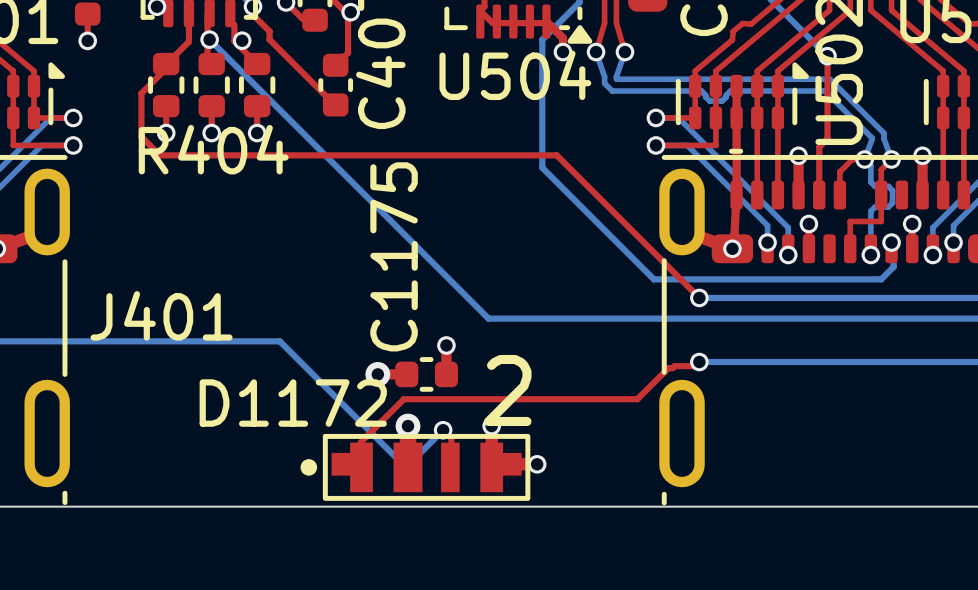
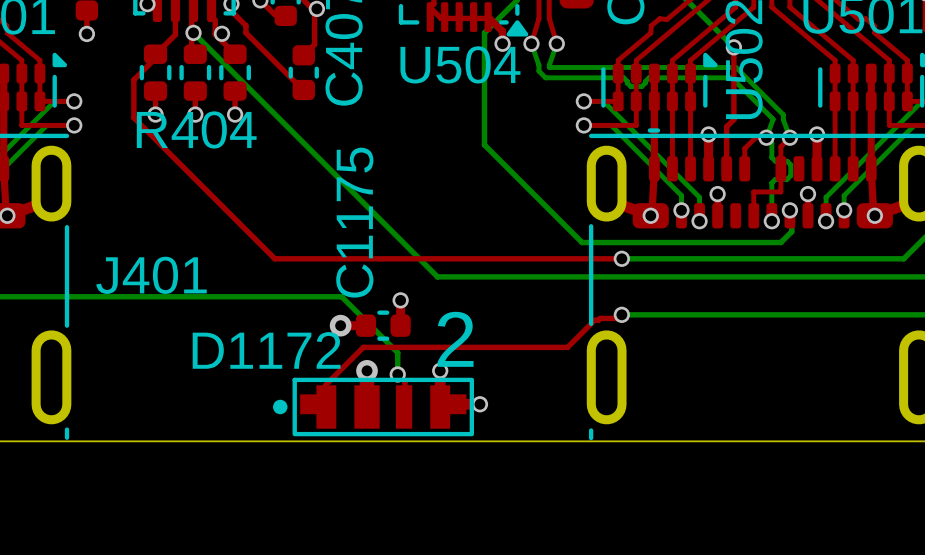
top track: (160, 155) (556, 155) (699, 297) -> (150, 134) (274, 258) (621, 258)
bottom track: (279, 341) (405, 467) (443, 430) -> (254, 296) (341, 296) (397, 352) (397, 374)

